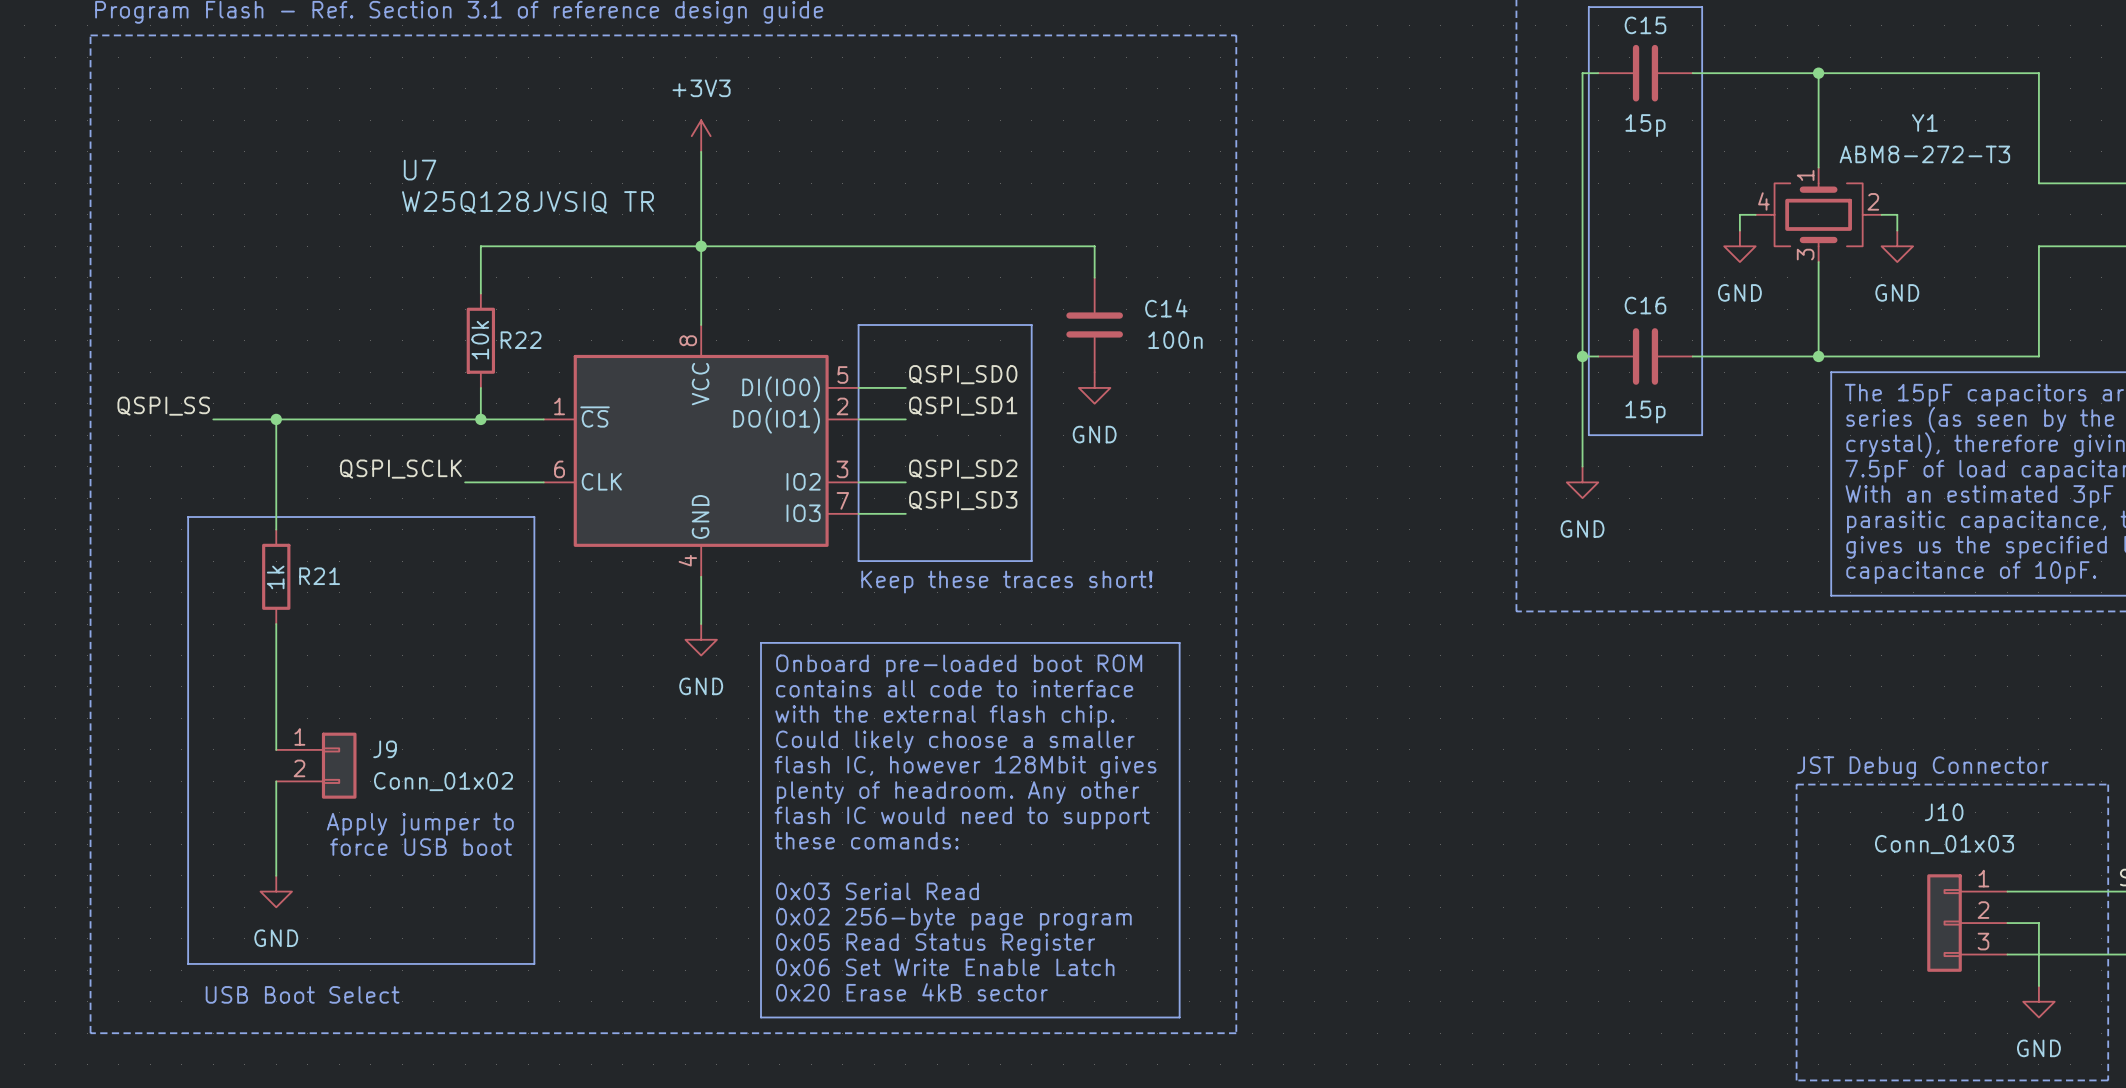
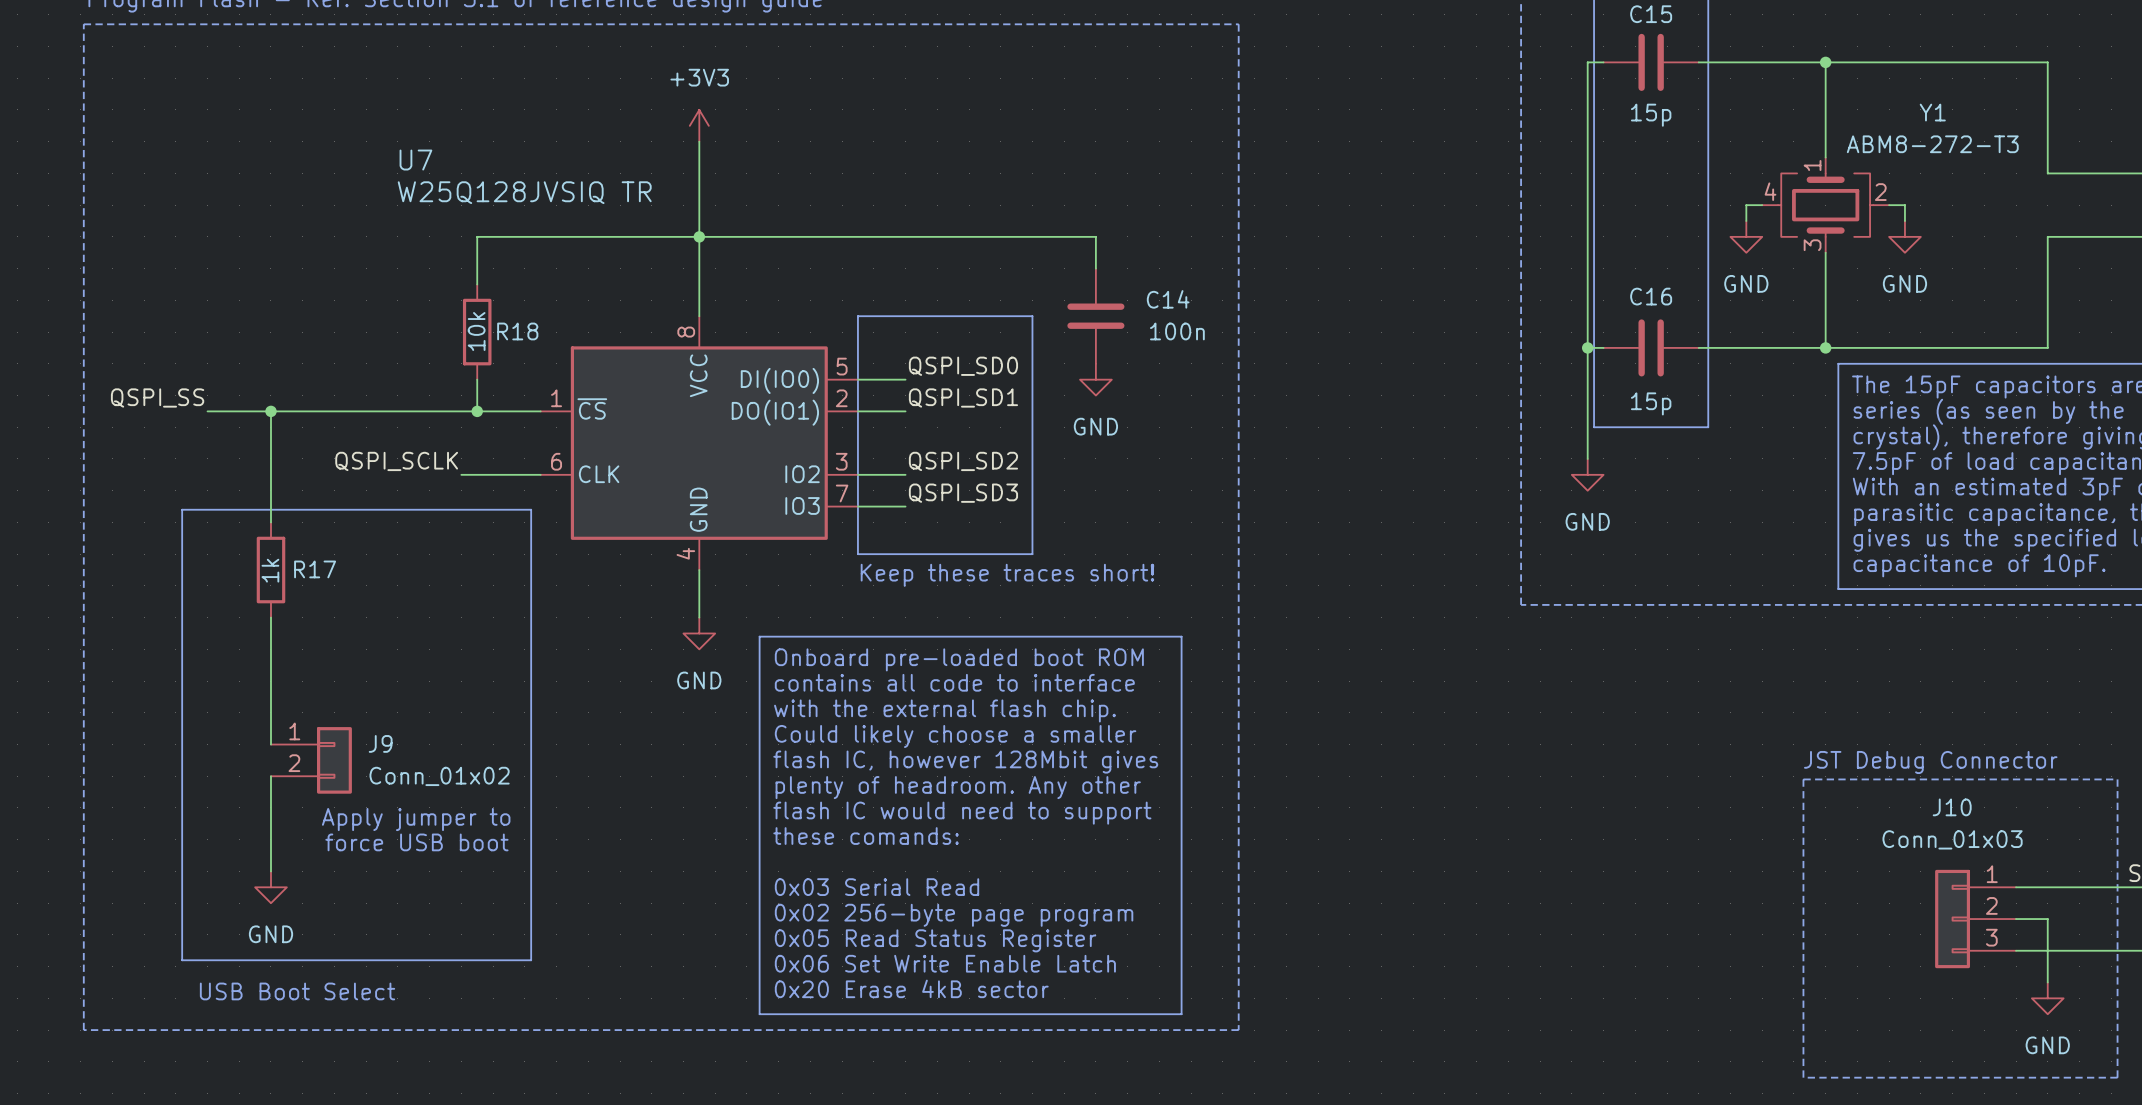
R22 name: R22 (521, 340) -> R18 (517, 331)
R21 name: R21 (319, 576) -> R17 (315, 569)

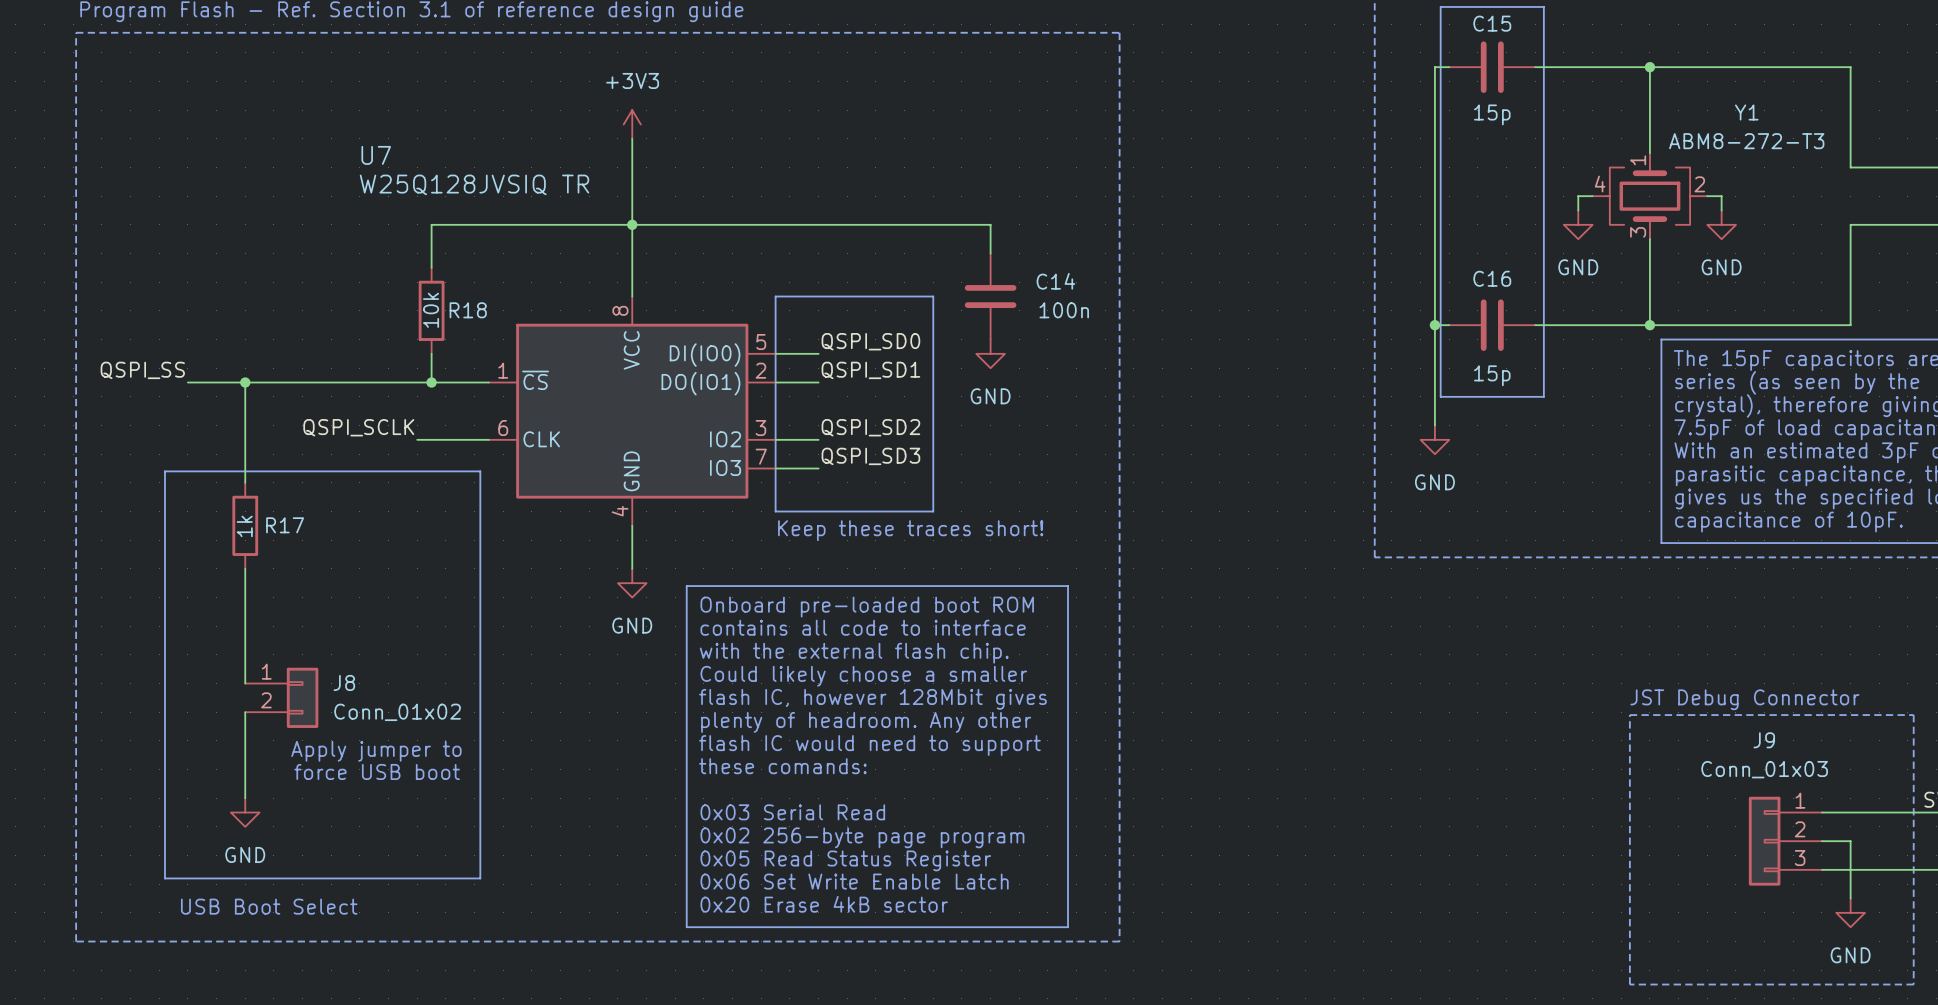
J9 name: J9 (380, 743) -> J8 (344, 682)
J10 name: J10 (1952, 807) -> J9 (1764, 740)

